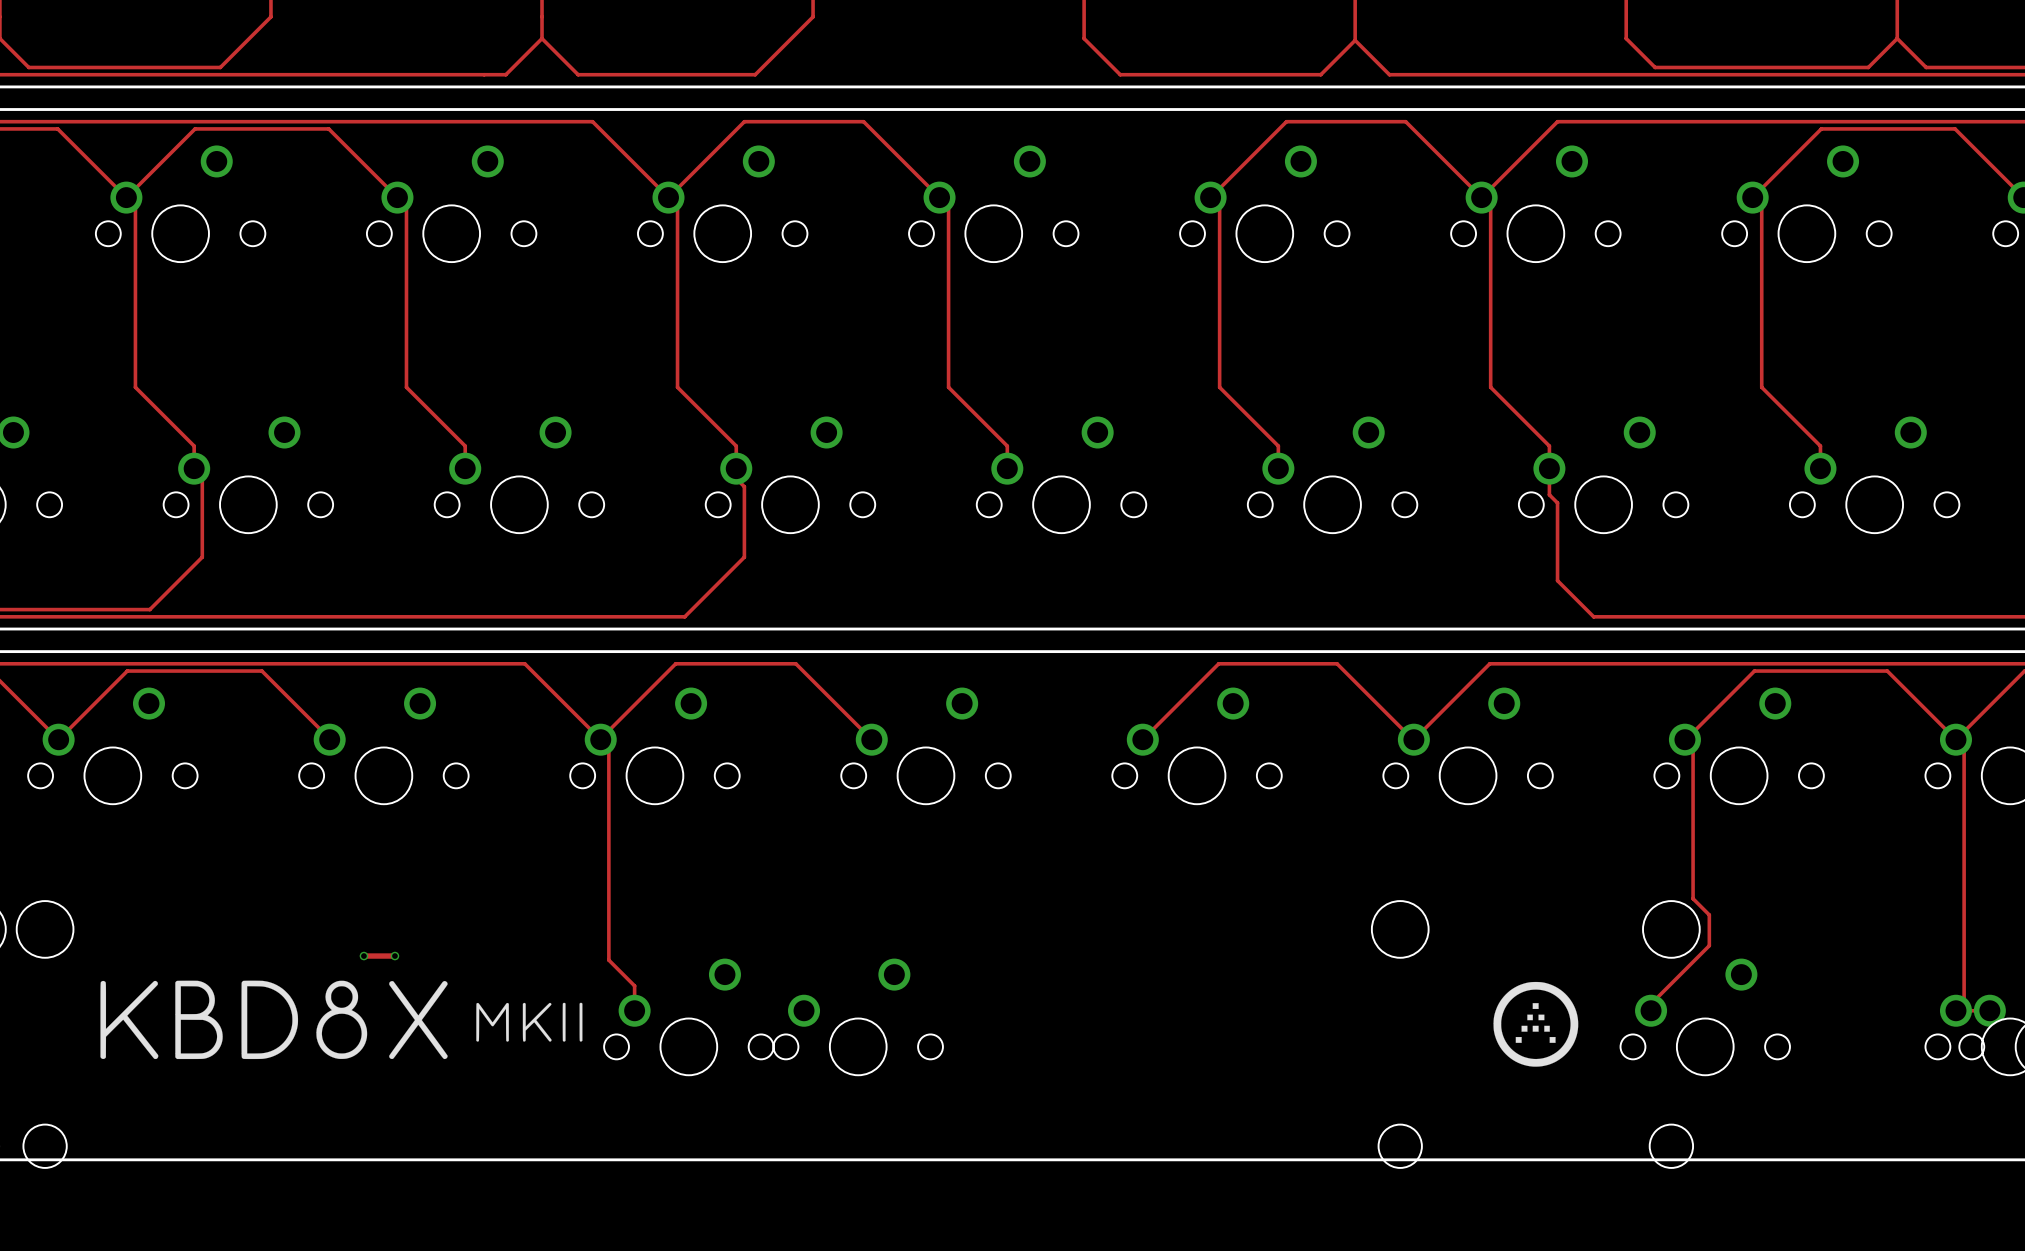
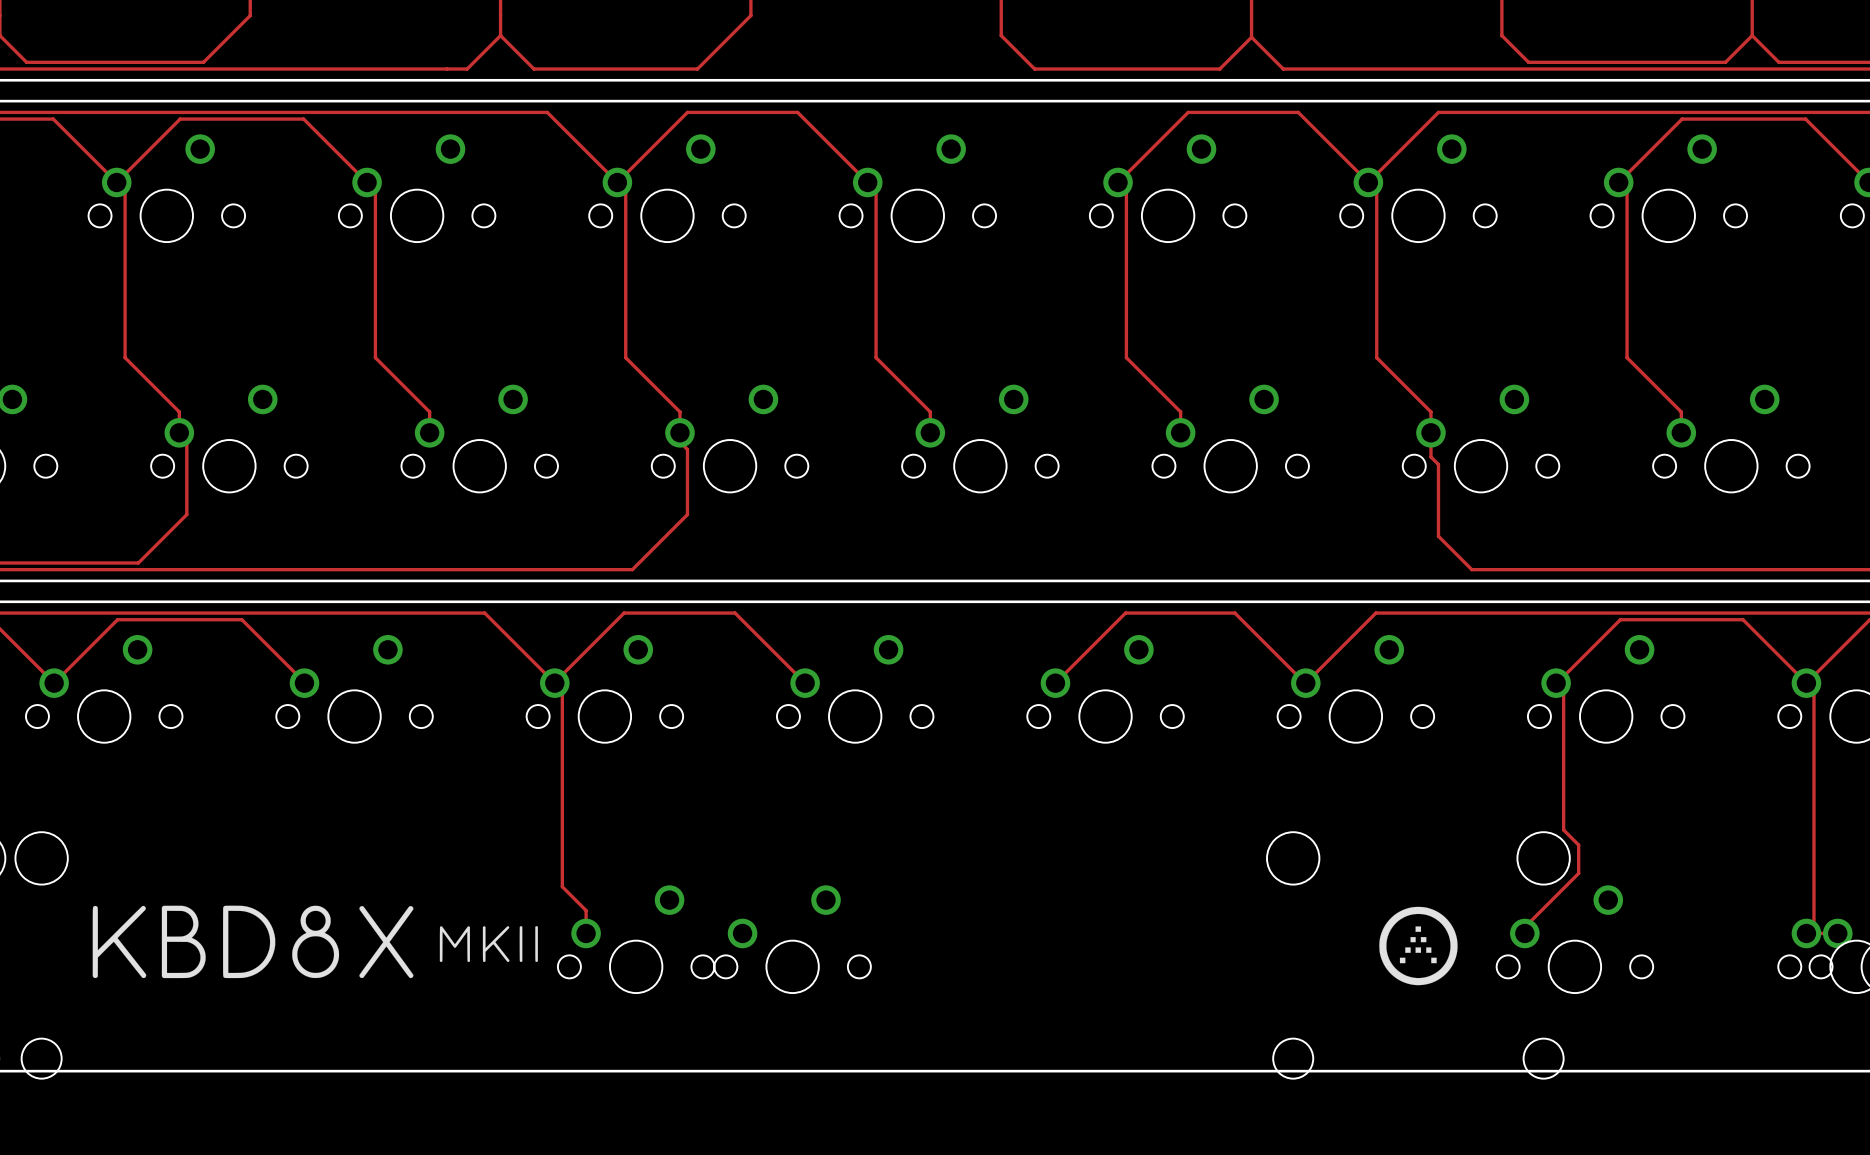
track: (363, 956) (394, 956) -> none
via: (363, 956) -> none
via: (394, 956) -> none

